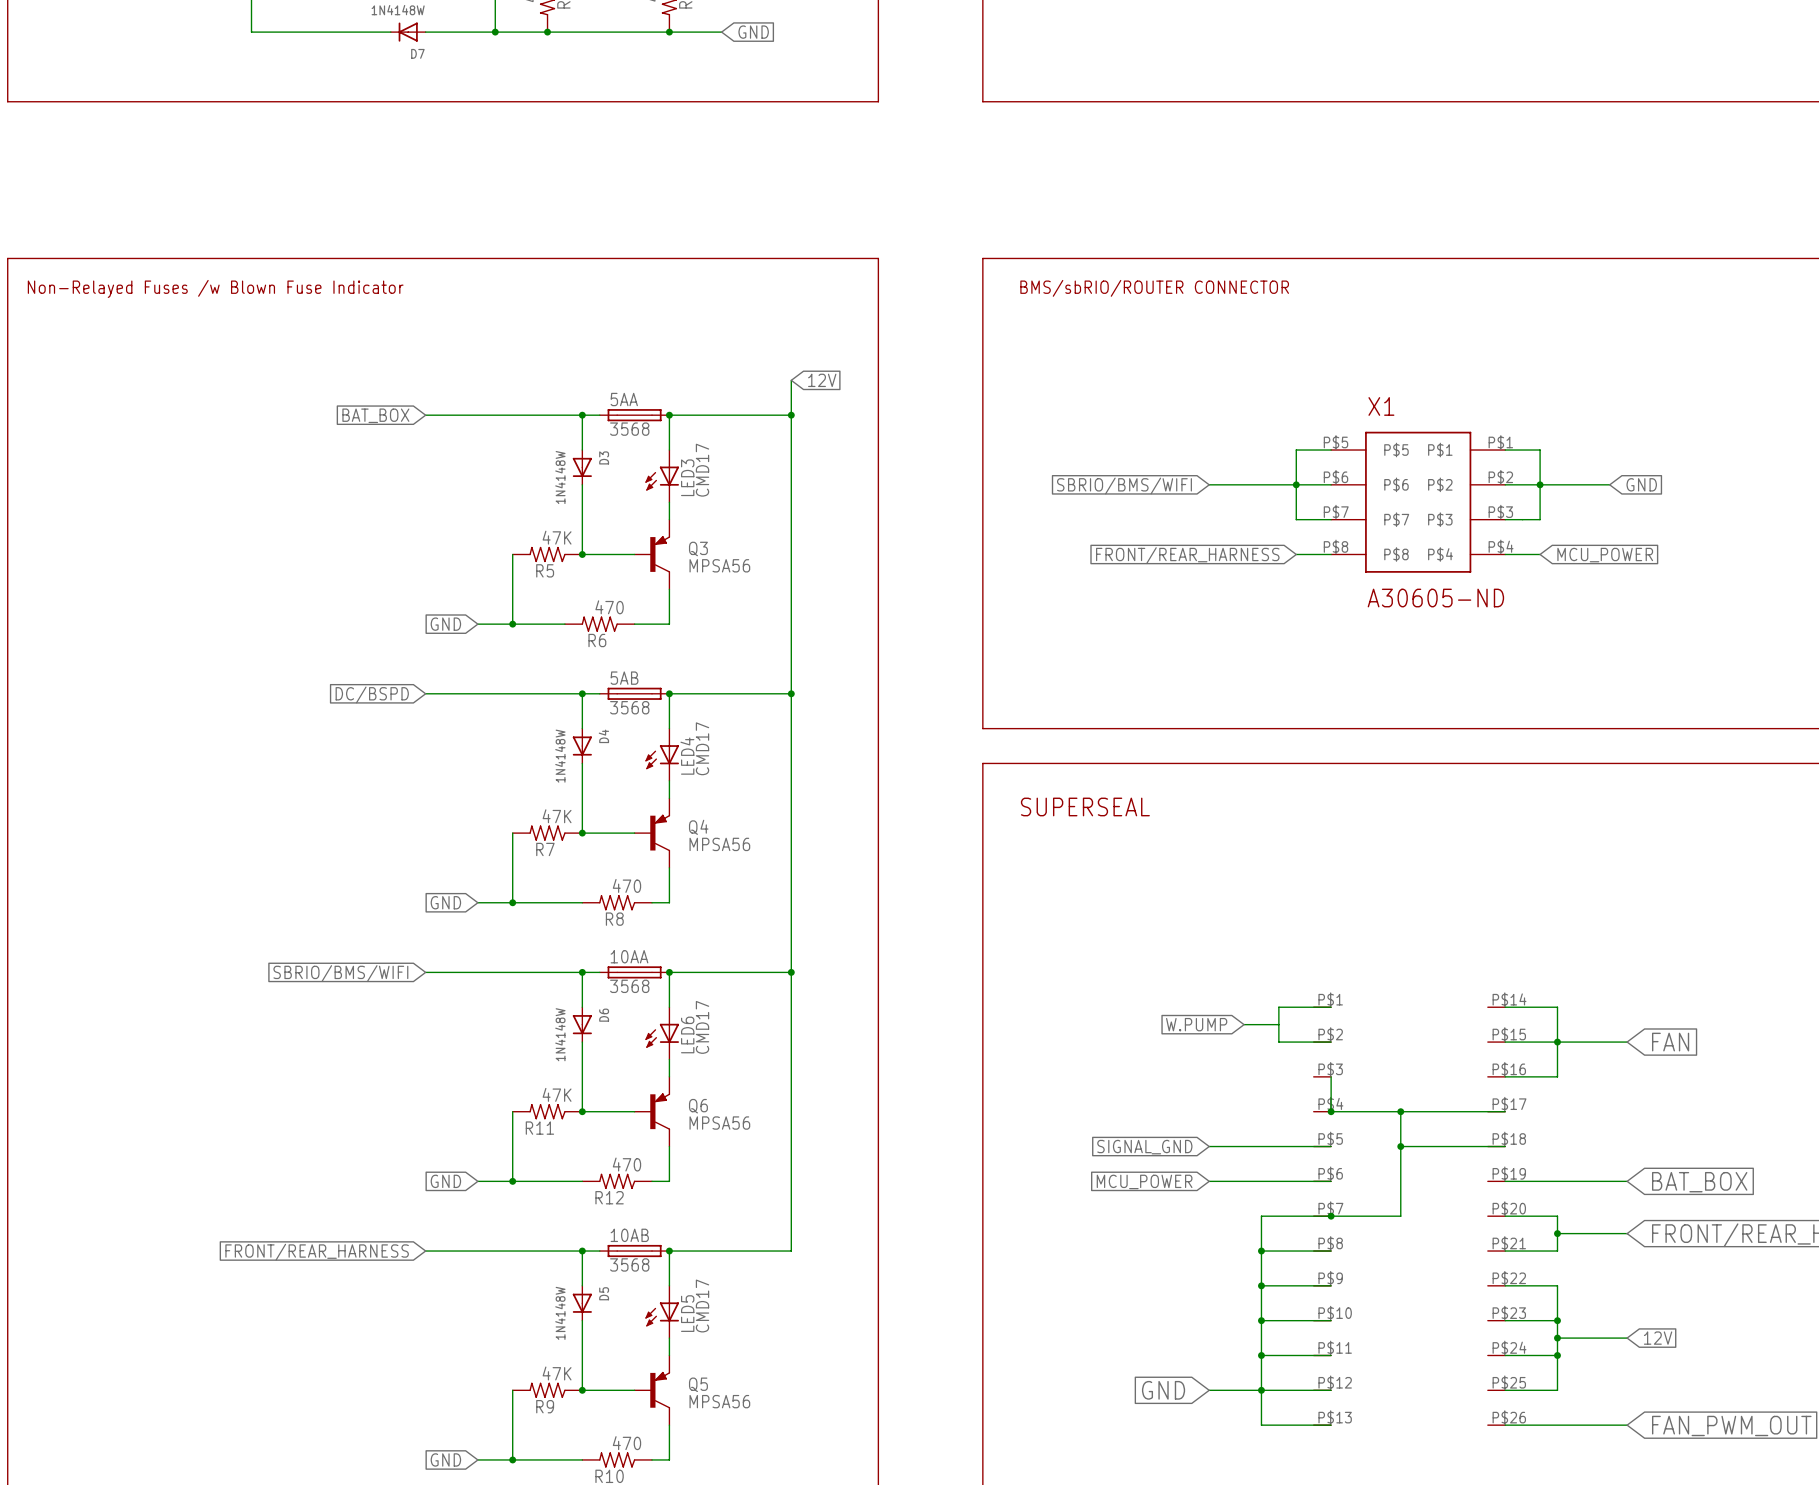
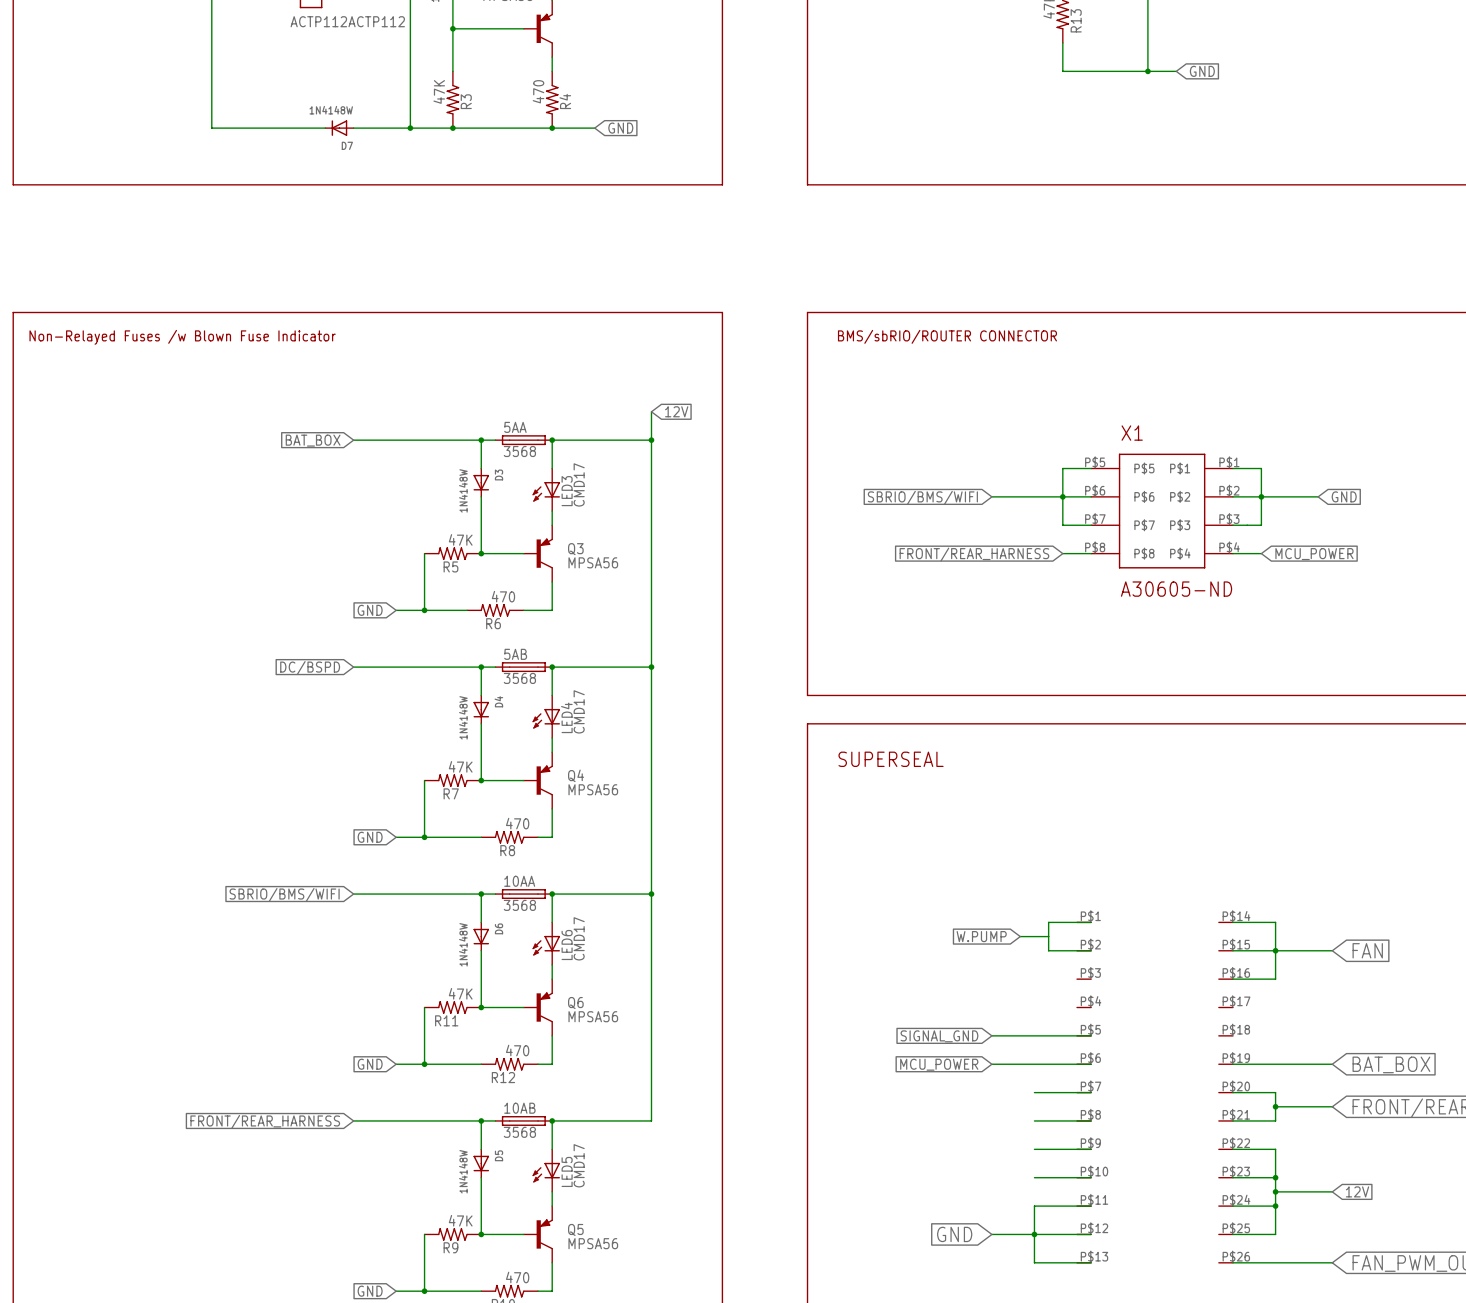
wire: (1331, 1076) (1331, 1111) (1505, 1111) -> none
junction: (1331, 1111) -> none
wire: (1400, 1111) (1400, 1216) (1331, 1216) -> none
junction: (1400, 1111) -> none
wire: (1400, 1146) (1505, 1146) -> none
junction: (1400, 1146) -> none
wire: (1261, 1216) (1261, 1355) -> none
junction: (1331, 1216) -> none
junction: (1261, 1251) -> none
junction: (1261, 1285) -> none
junction: (1261, 1320) -> none
junction: (1261, 1355) -> none

